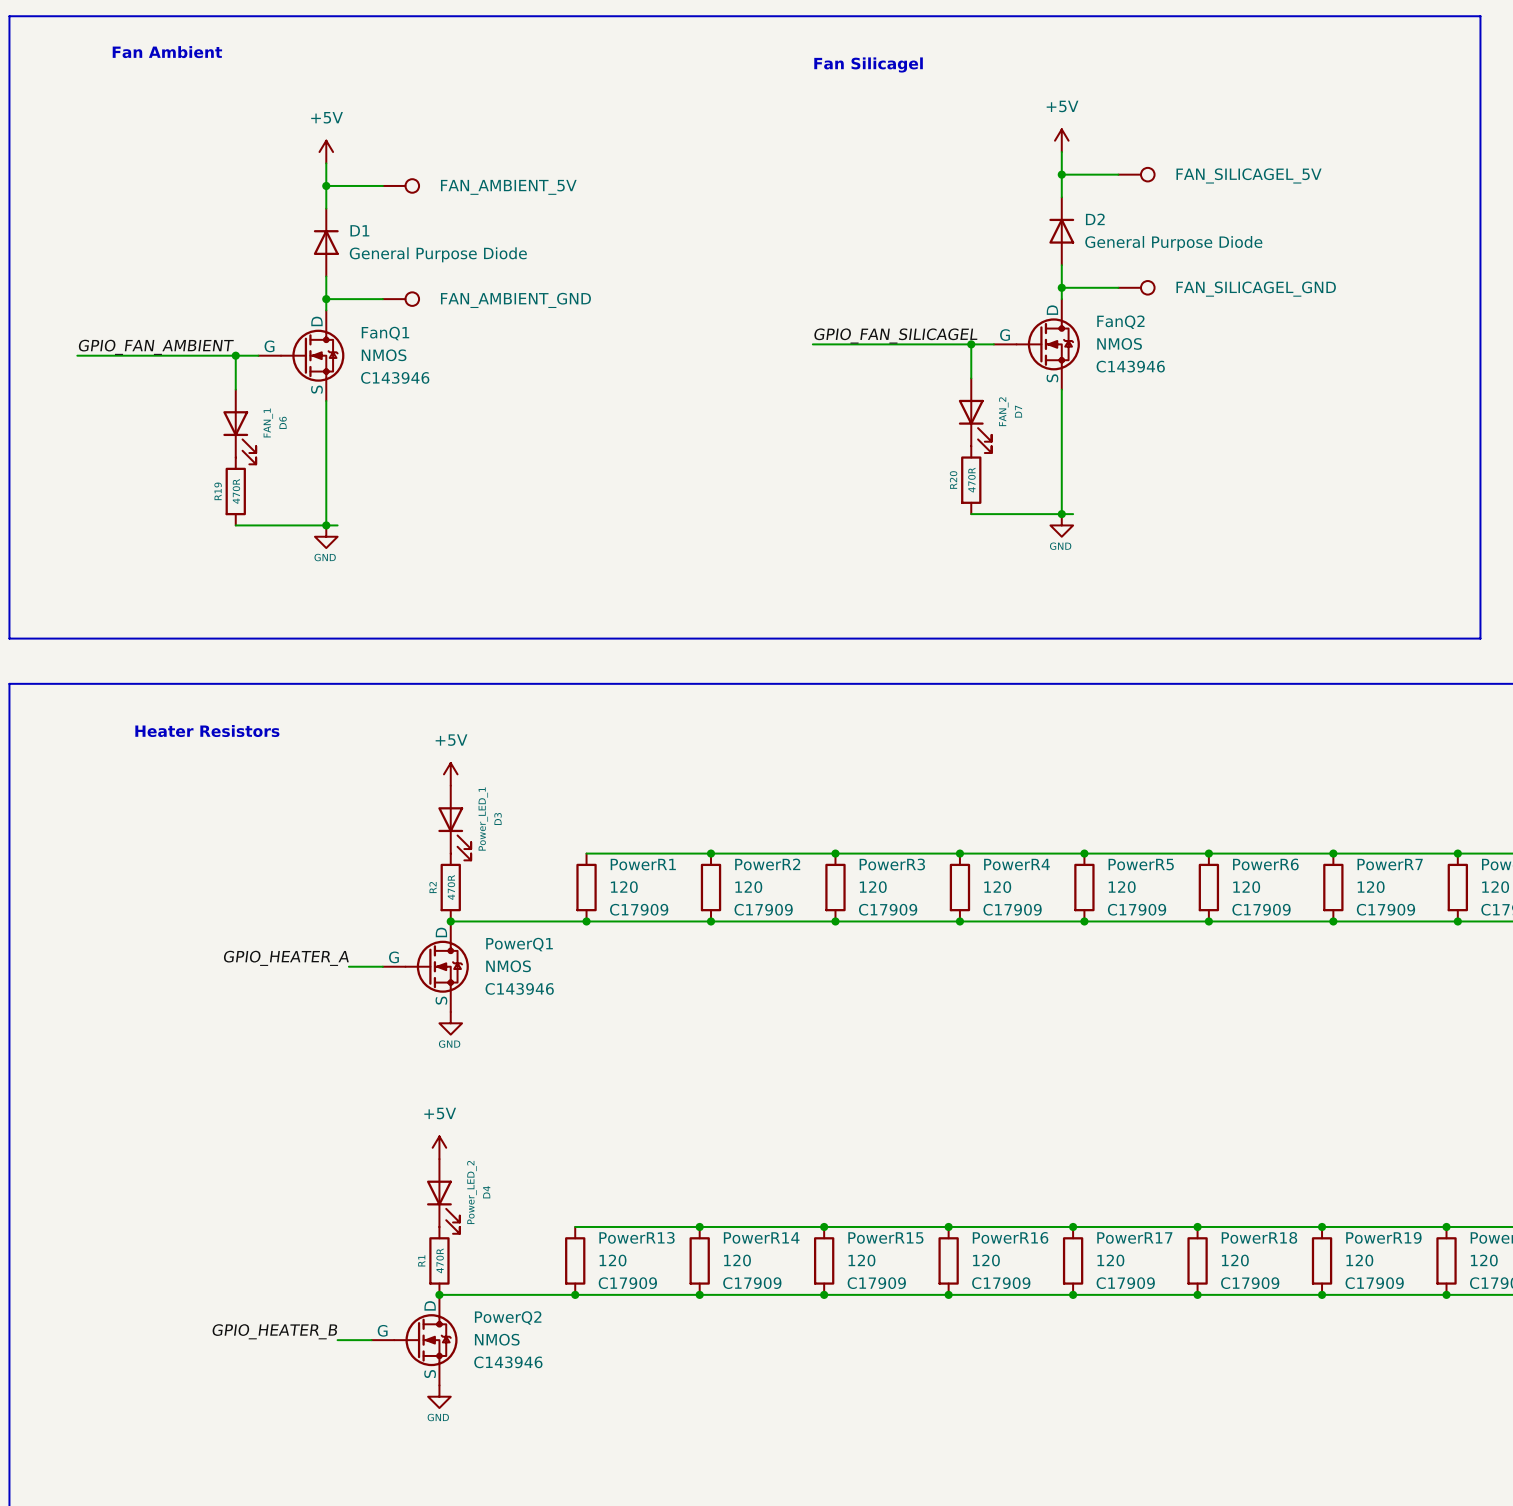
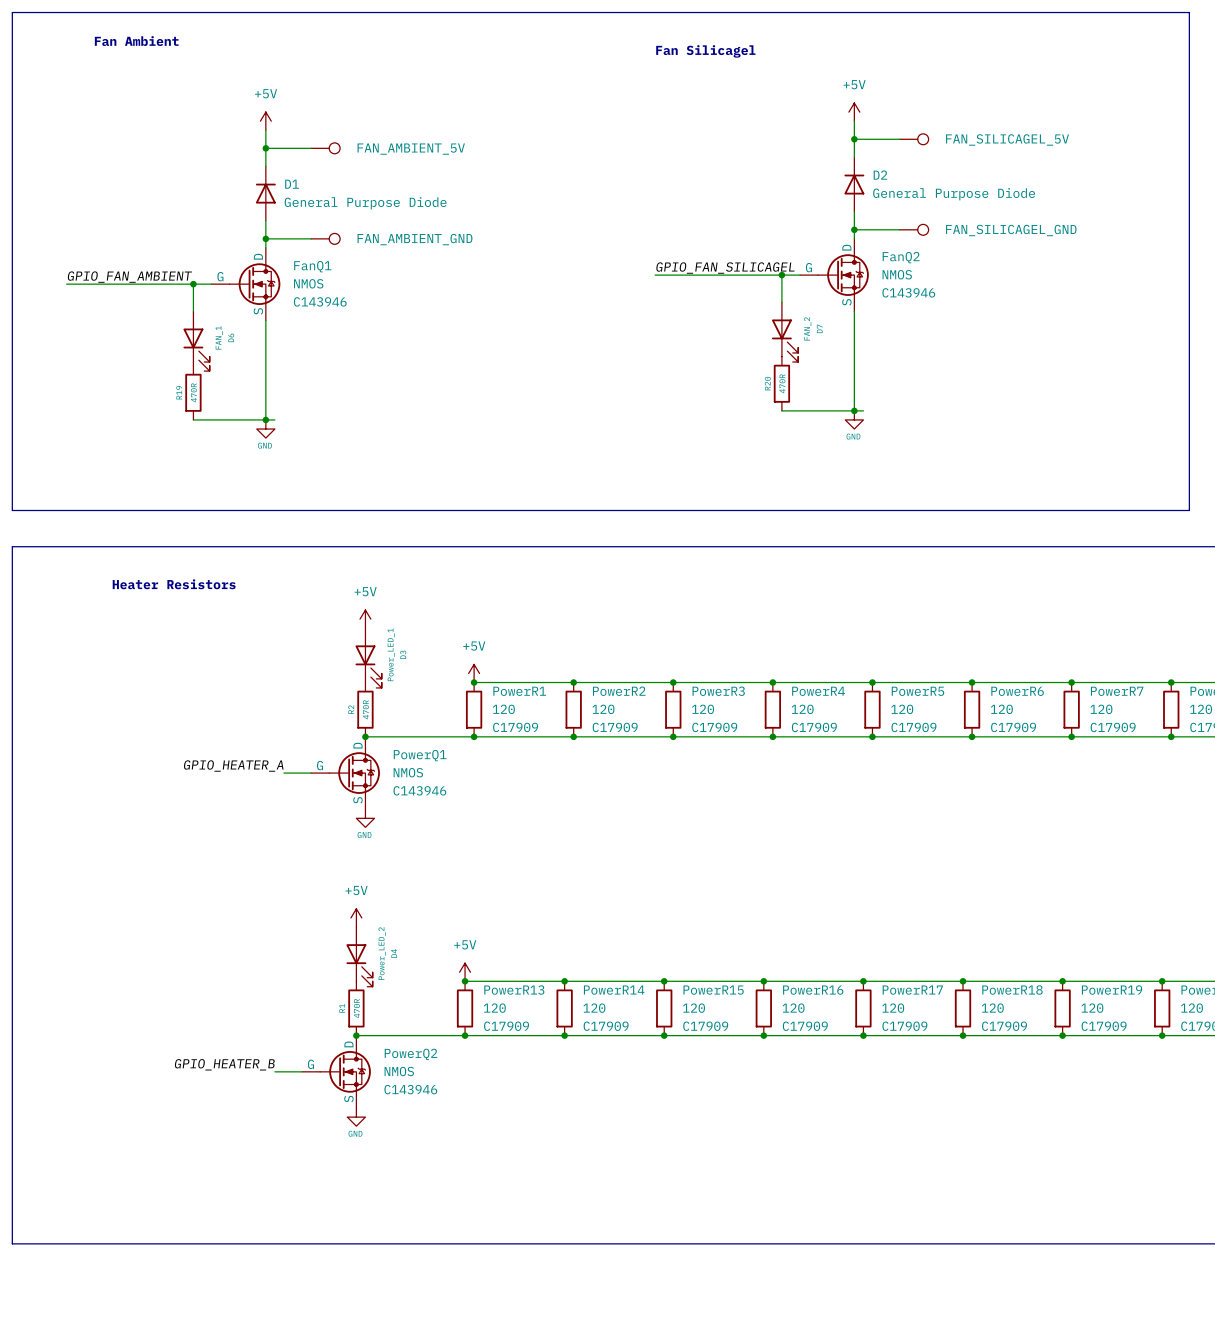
power symbol: none -> +5V (474, 673)
junction: none -> (474, 682)
power symbol: none -> +5V (465, 972)
junction: none -> (465, 981)

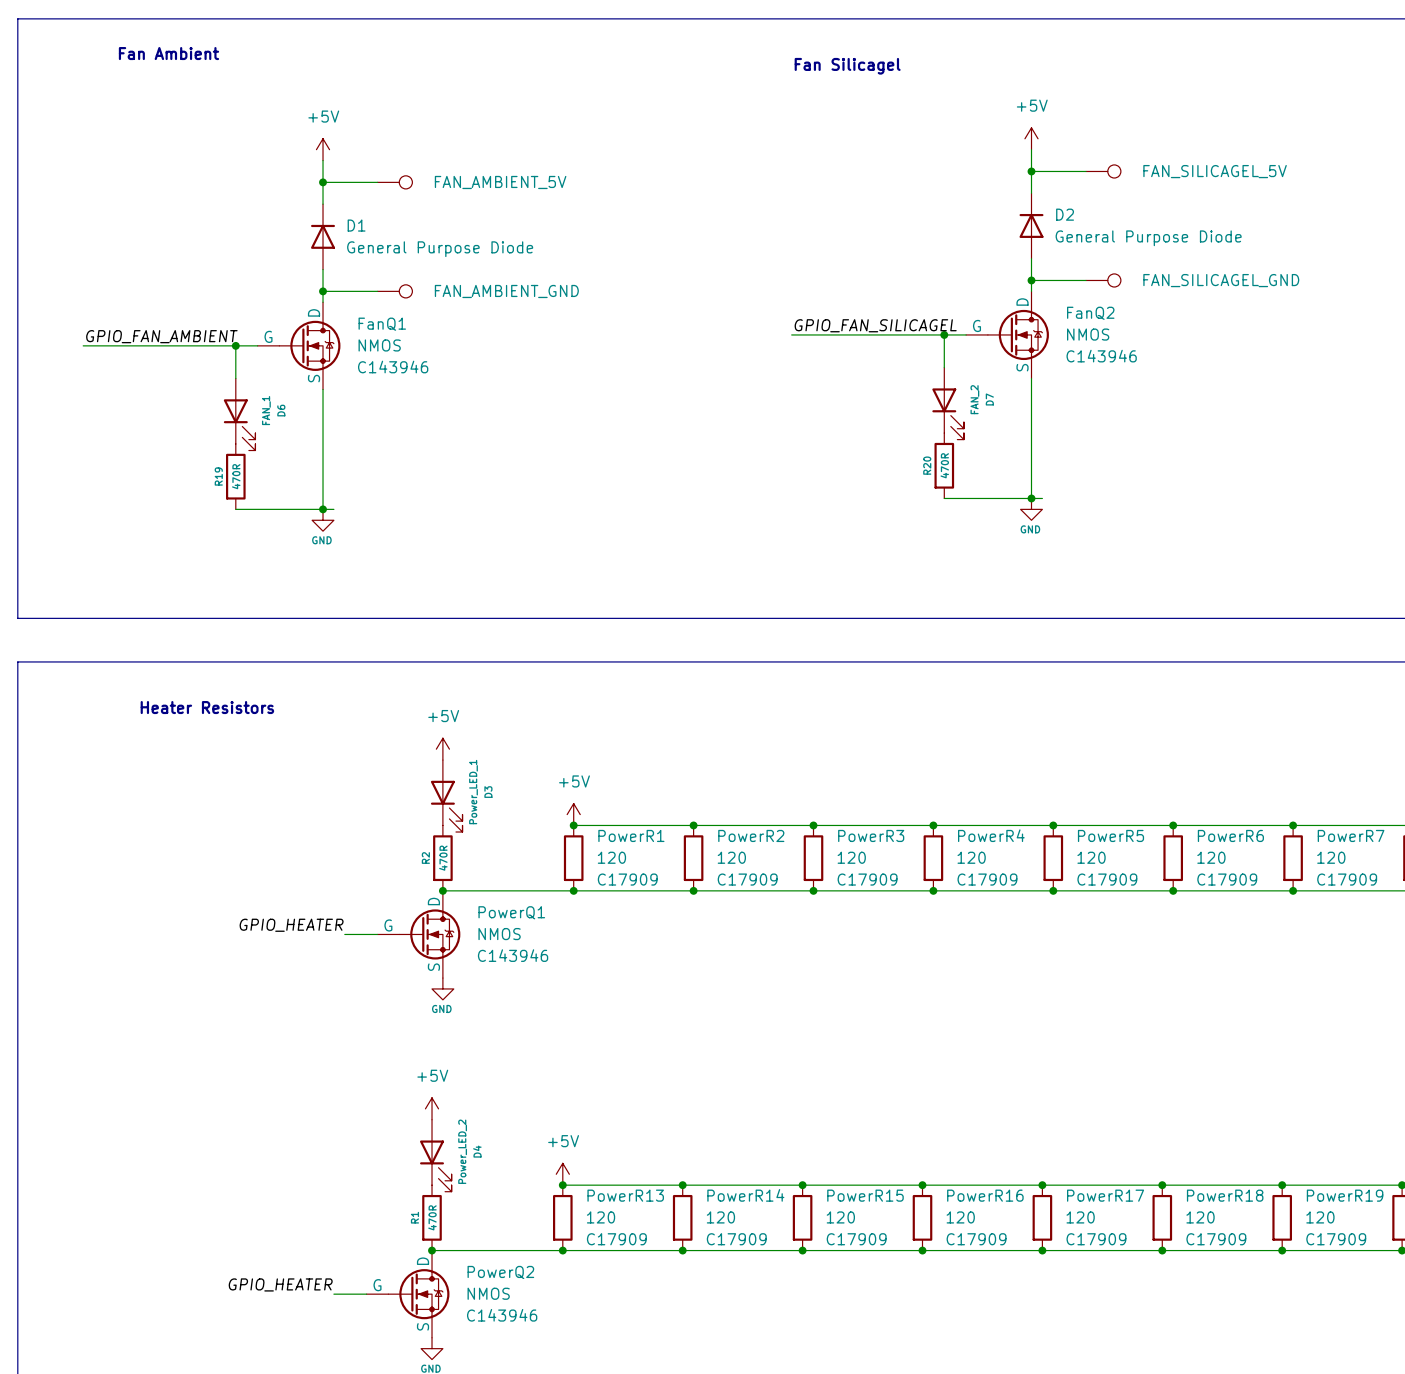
label: GPIO_HEATER_A (233, 766) -> GPIO_HEATER (291, 925)
label: GPIO_HEATER_B (224, 1064) -> GPIO_HEATER (280, 1284)

